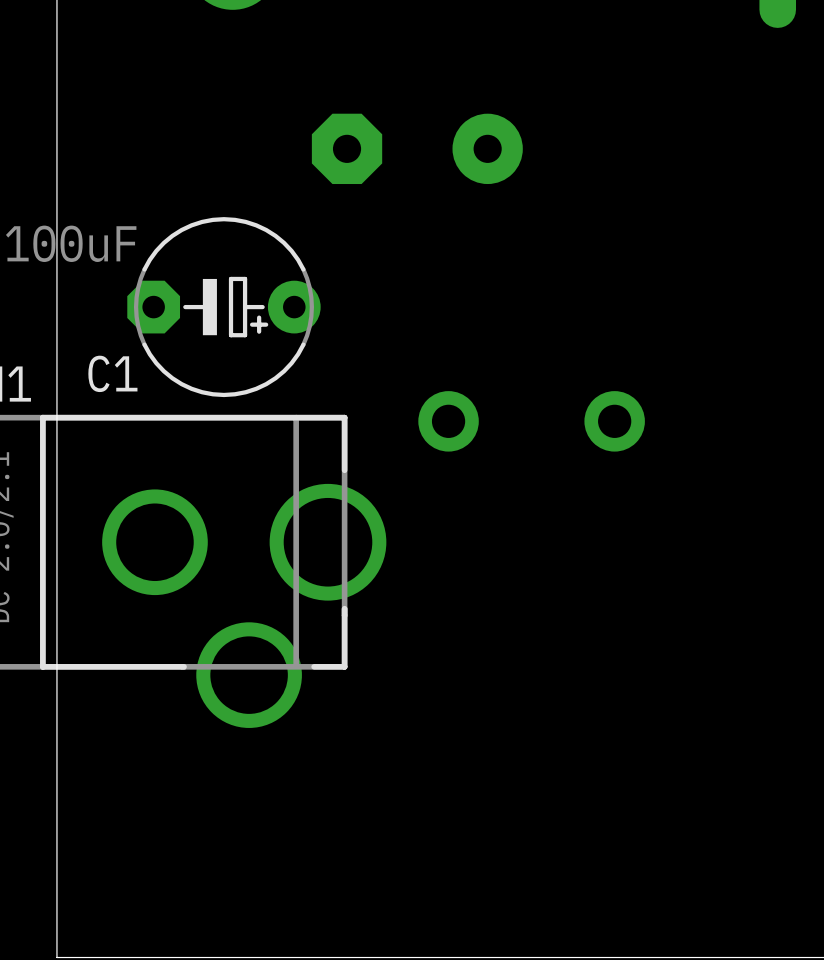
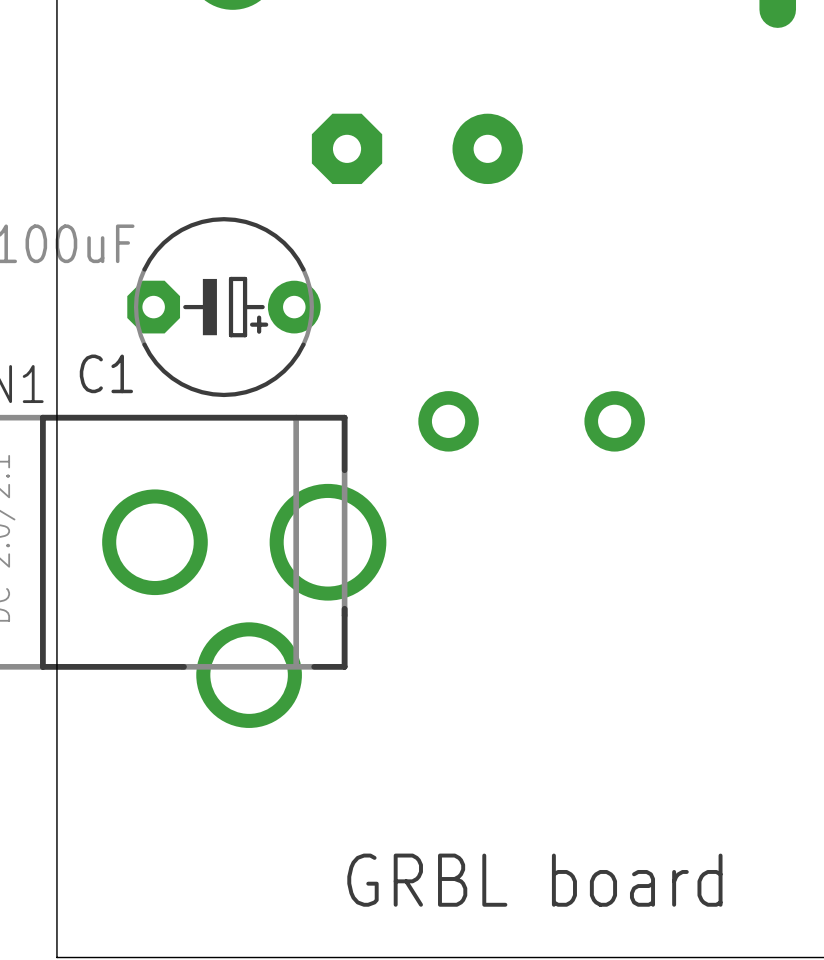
text: none -> GRBL board (534, 880)

